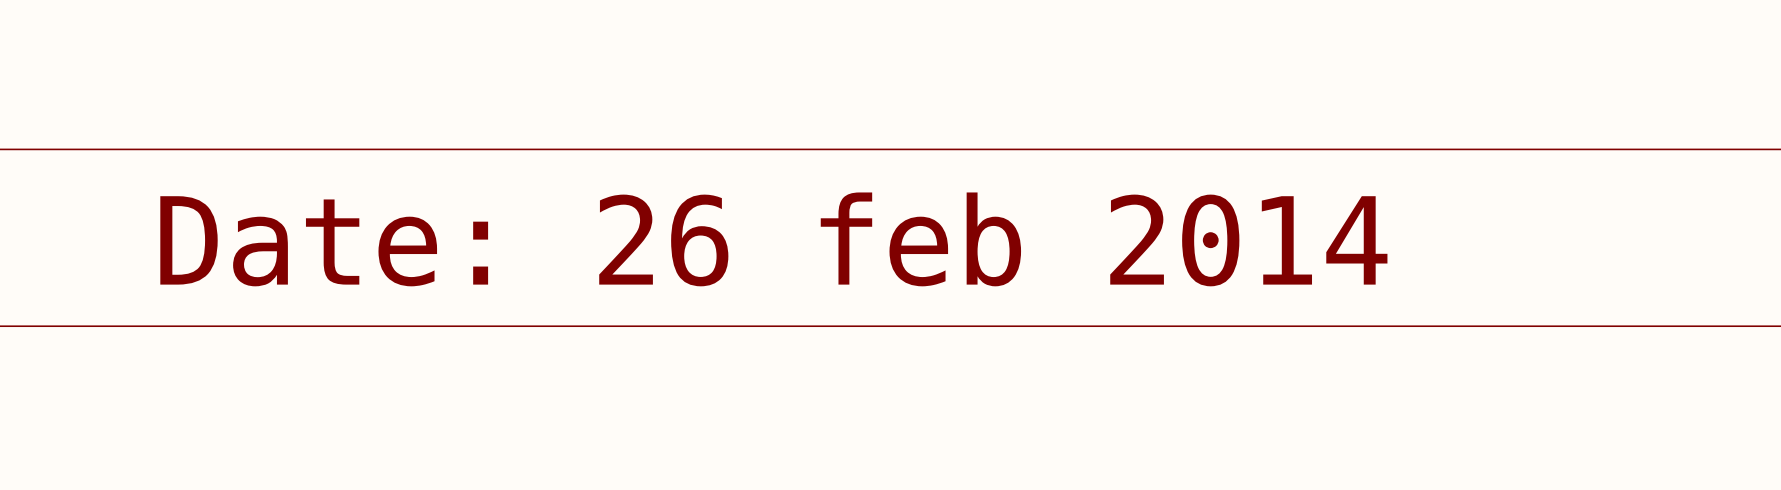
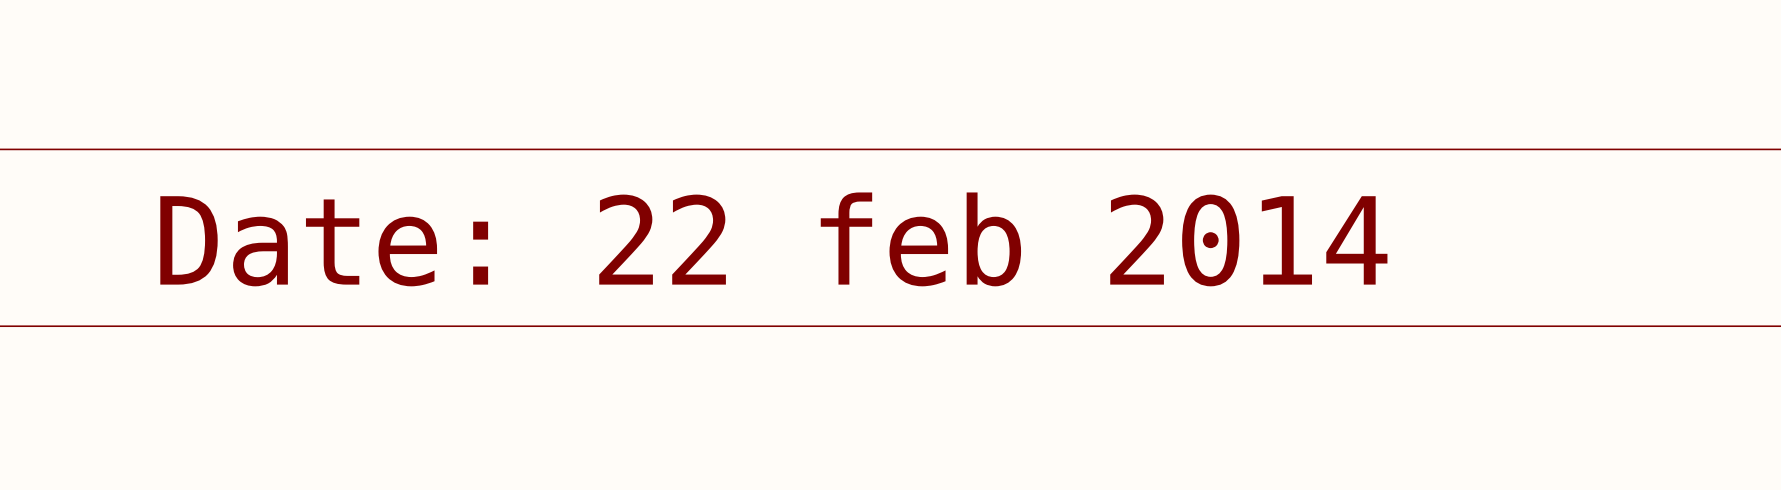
title block: Date: 26 feb 2014 (773, 239) -> Date: 22 feb 2014 (773, 239)

